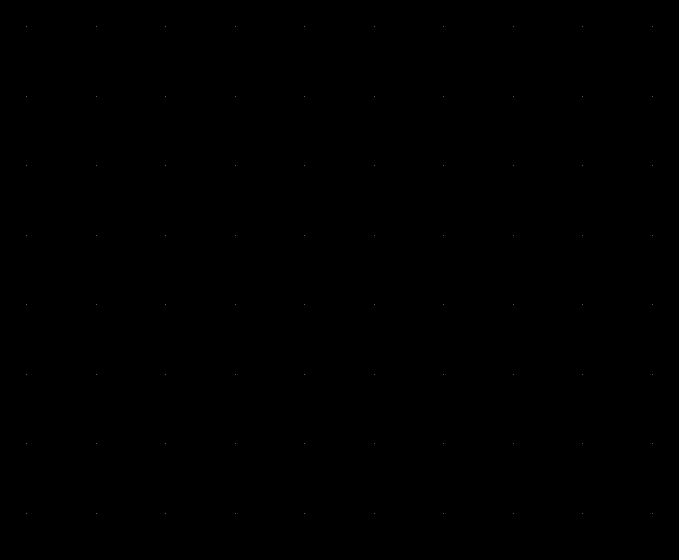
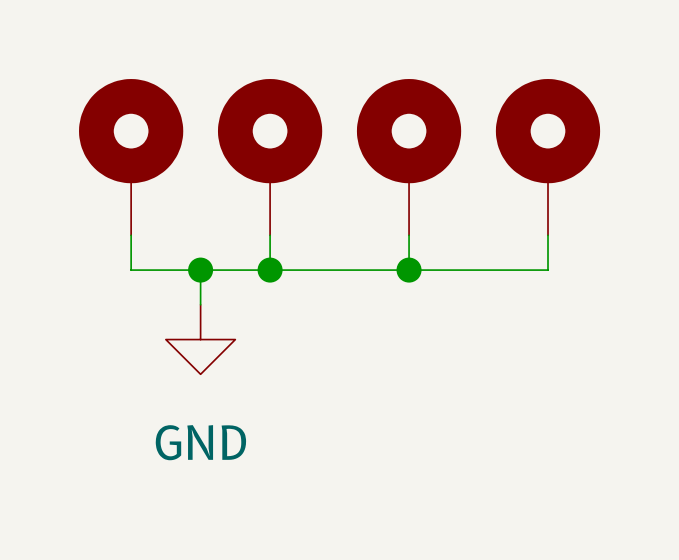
part: none -> (131, 157)
part: none -> (270, 157)
part: none -> (409, 157)
part: none -> (548, 157)
wire: none -> (131, 235) (131, 270) (548, 270) (548, 235)
wire: none -> (270, 235) (270, 270)
wire: none -> (409, 235) (409, 270)
wire: none -> (200, 270) (200, 304)
junction: none -> (200, 270)
junction: none -> (270, 270)
junction: none -> (409, 270)
power symbol: none -> GND (200, 339)

